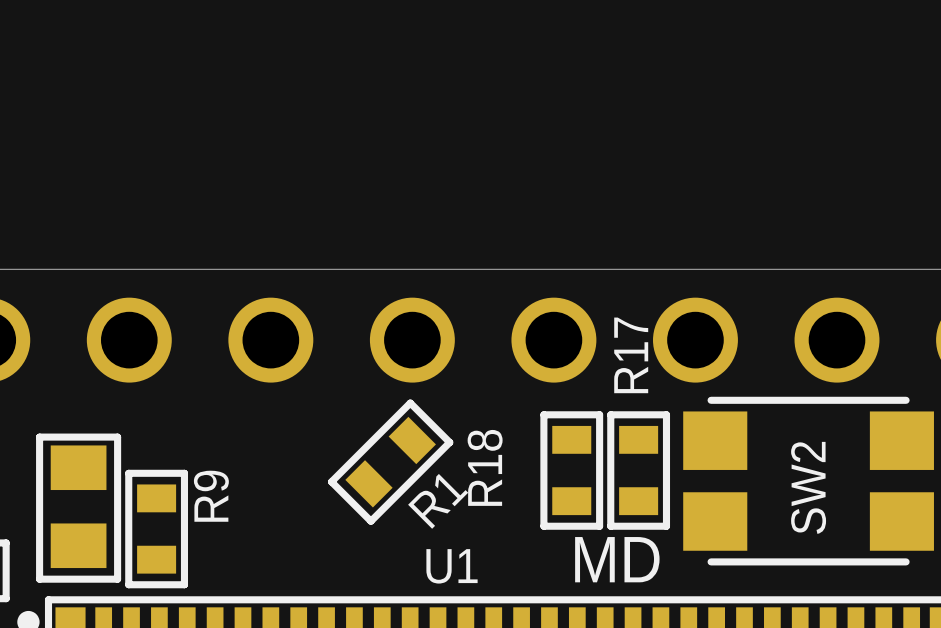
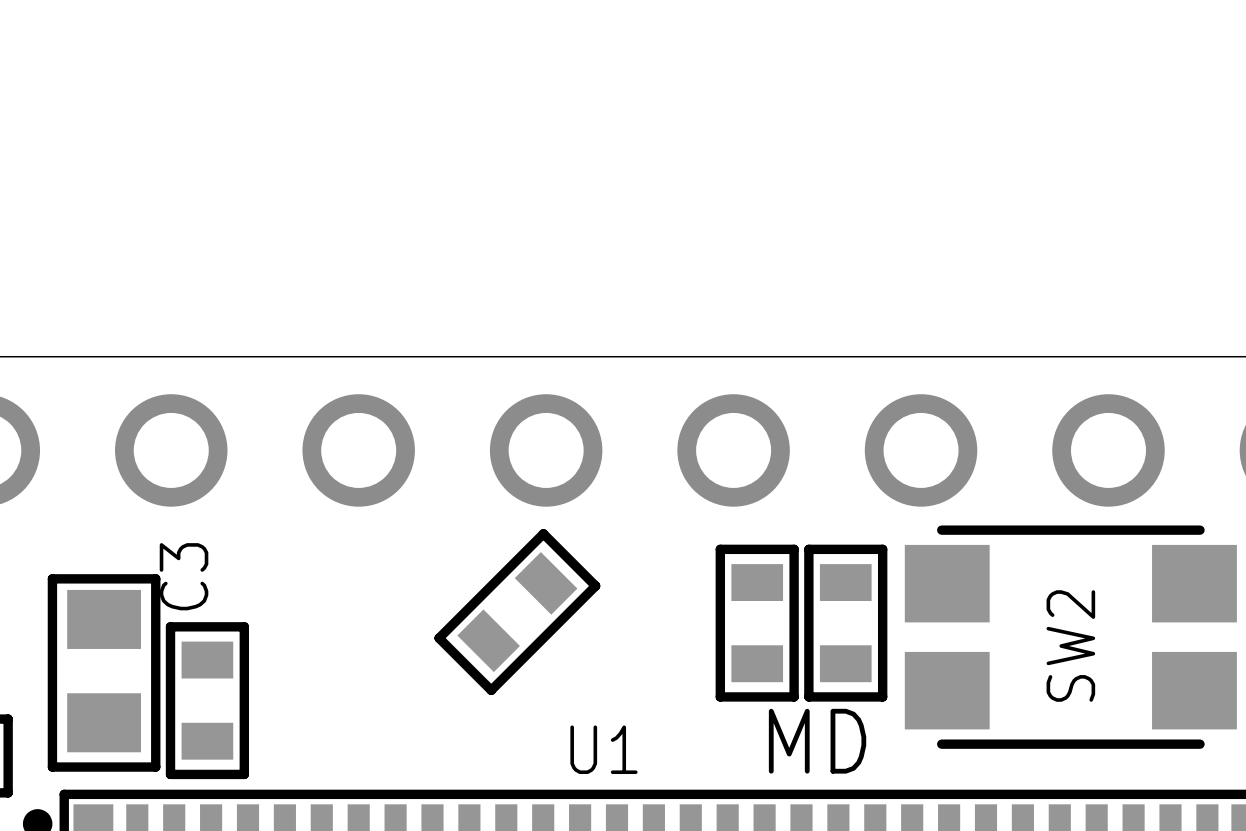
R17 name: R17 (631, 355) -> none
C3 name: none -> C3 (184, 576)
R18 name: R18 (485, 467) -> none
R9 name: R9 (211, 496) -> none
R1 name: R1 (438, 501) -> none

